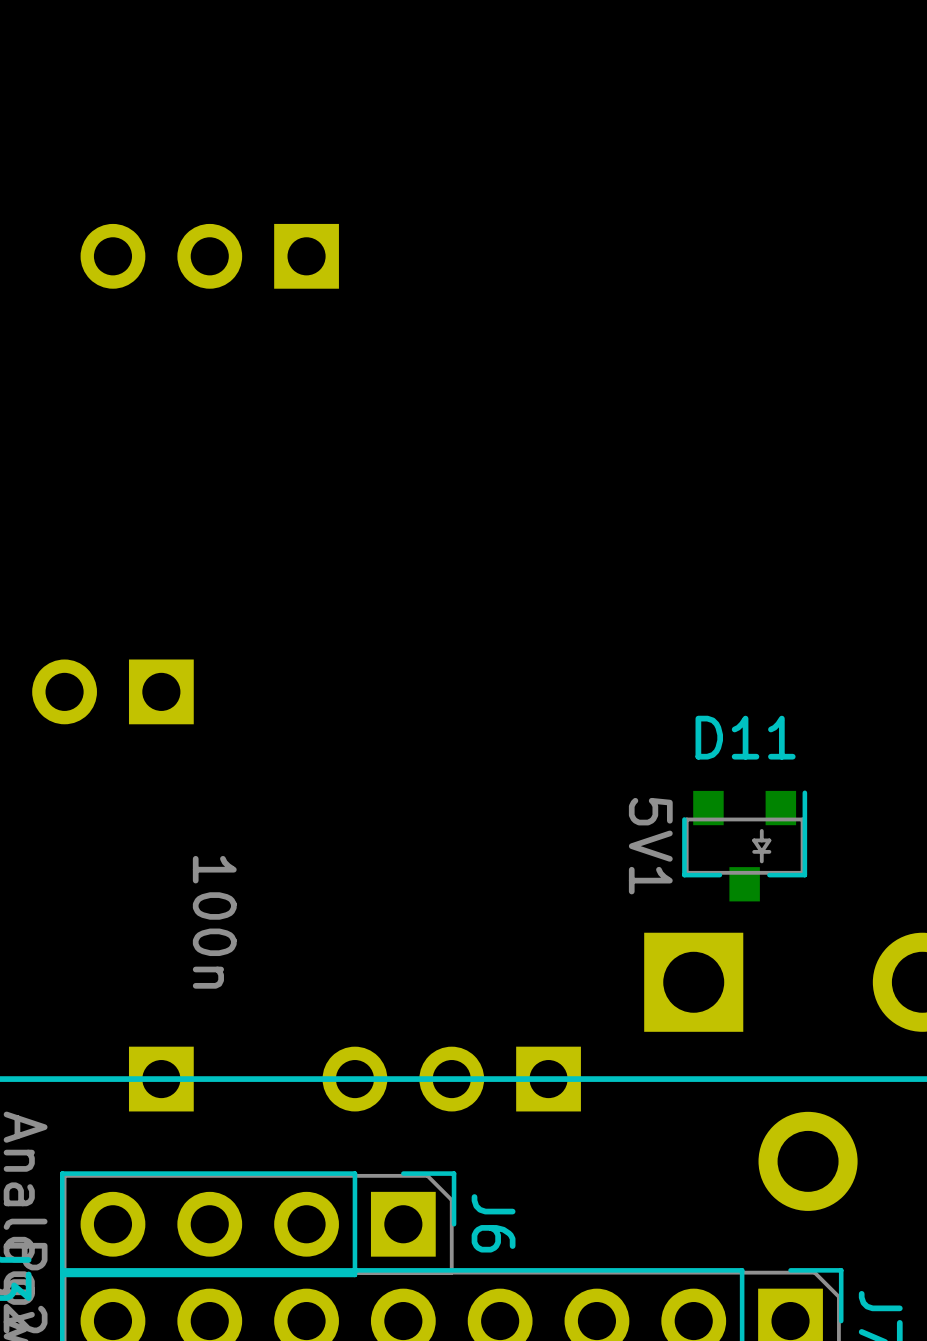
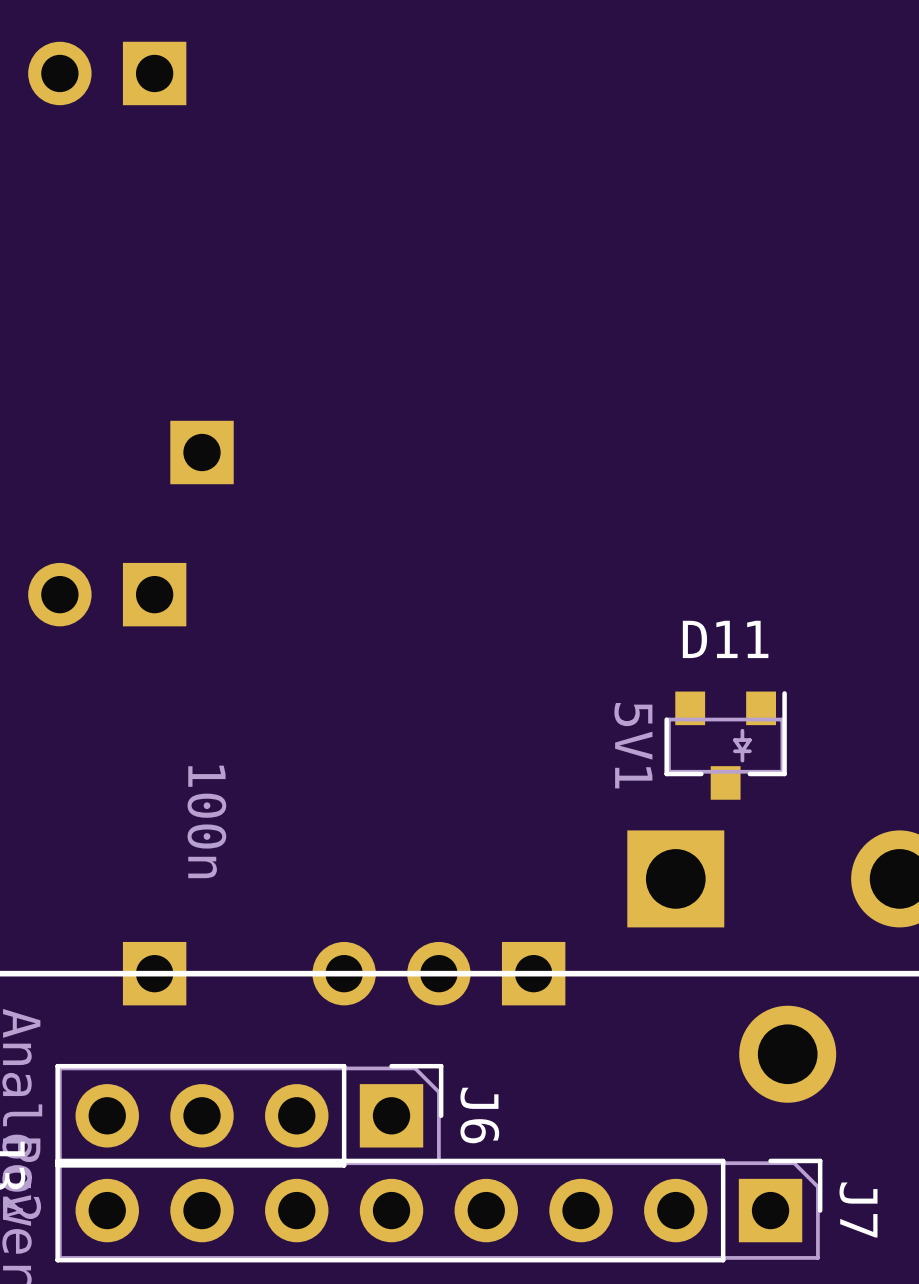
part: none -> (107, 73)
part: (209, 256) -> none
part: none -> (202, 452)

